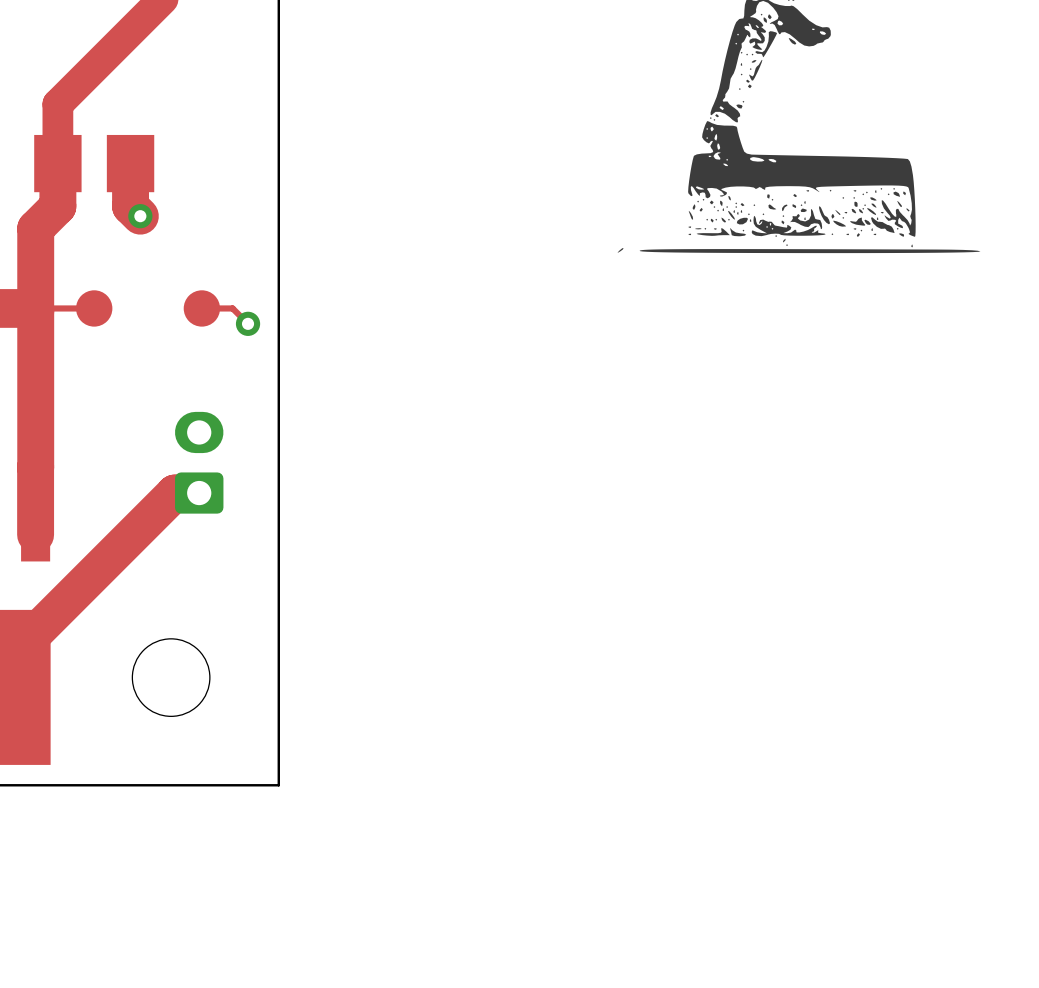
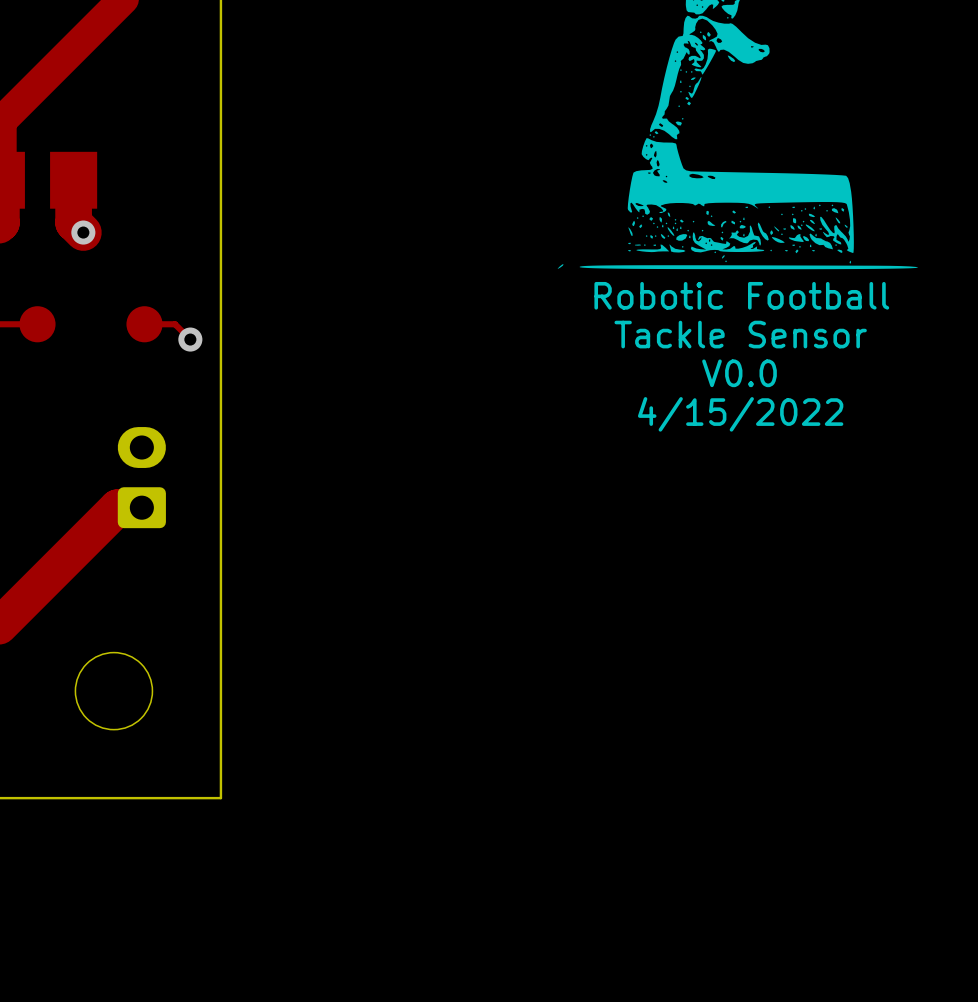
text: none -> Robotic Football (741, 295)
text: none -> Tackle Sensor (740, 334)
text: none -> V0.0 (739, 373)
text: none -> 4/15/2022 (740, 414)

